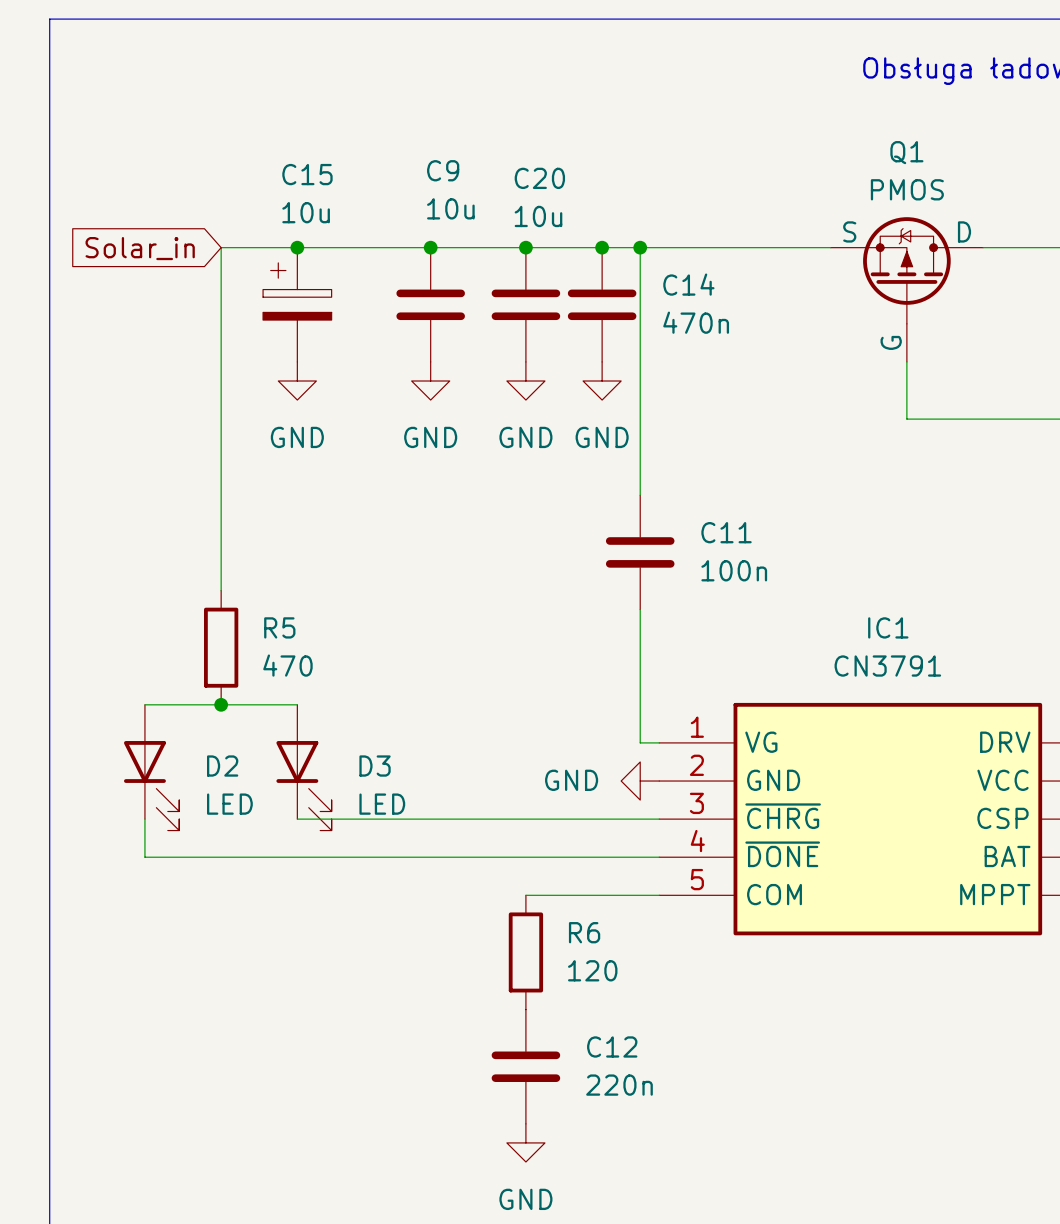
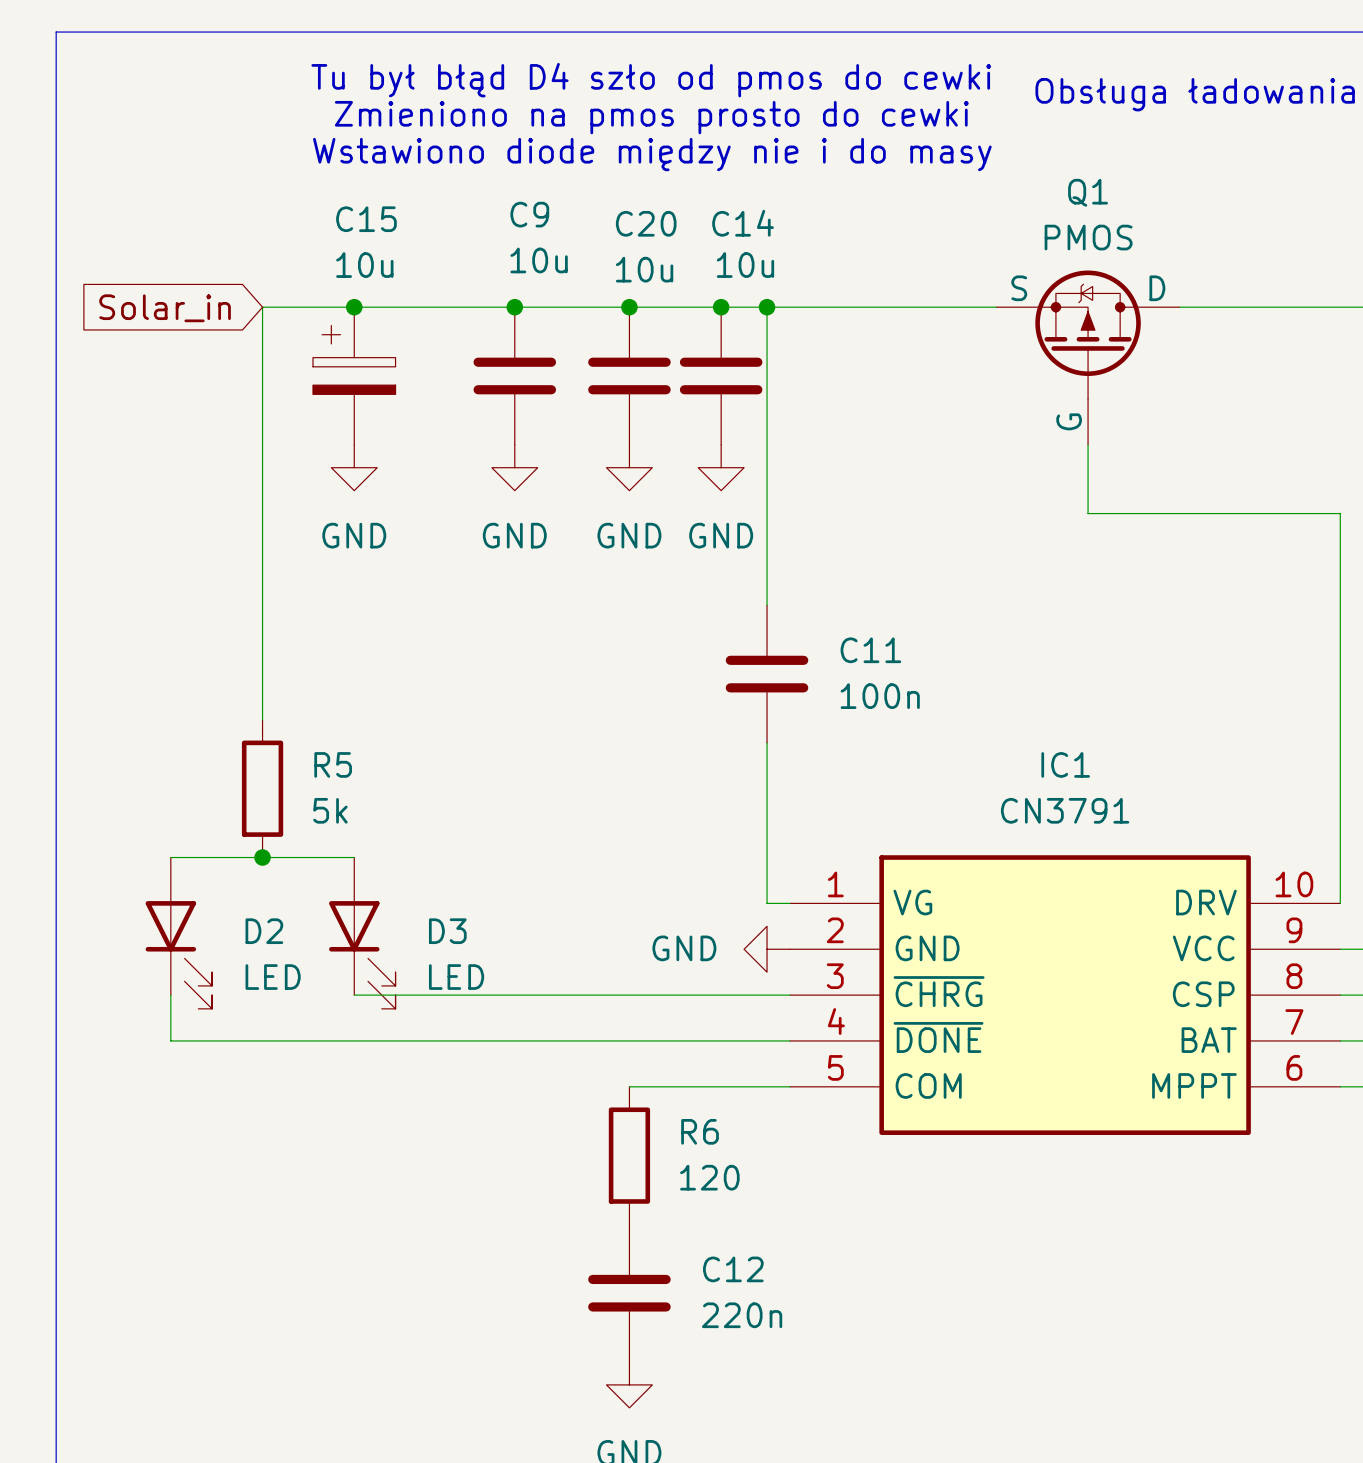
text: none -> Tu był błąd D4 szło od pmos do cewki (651, 80)
text: none -> Zmieniono na pmos prosto do cewki (651, 117)
text: none -> Wstawiono diode między nie i do masy (652, 154)
C14 name position: C14 (688, 284) -> C14 (743, 223)
C14 value: 470n (696, 322) -> 10u (745, 265)
R5 value: 470 (287, 665) -> 5k (330, 810)

